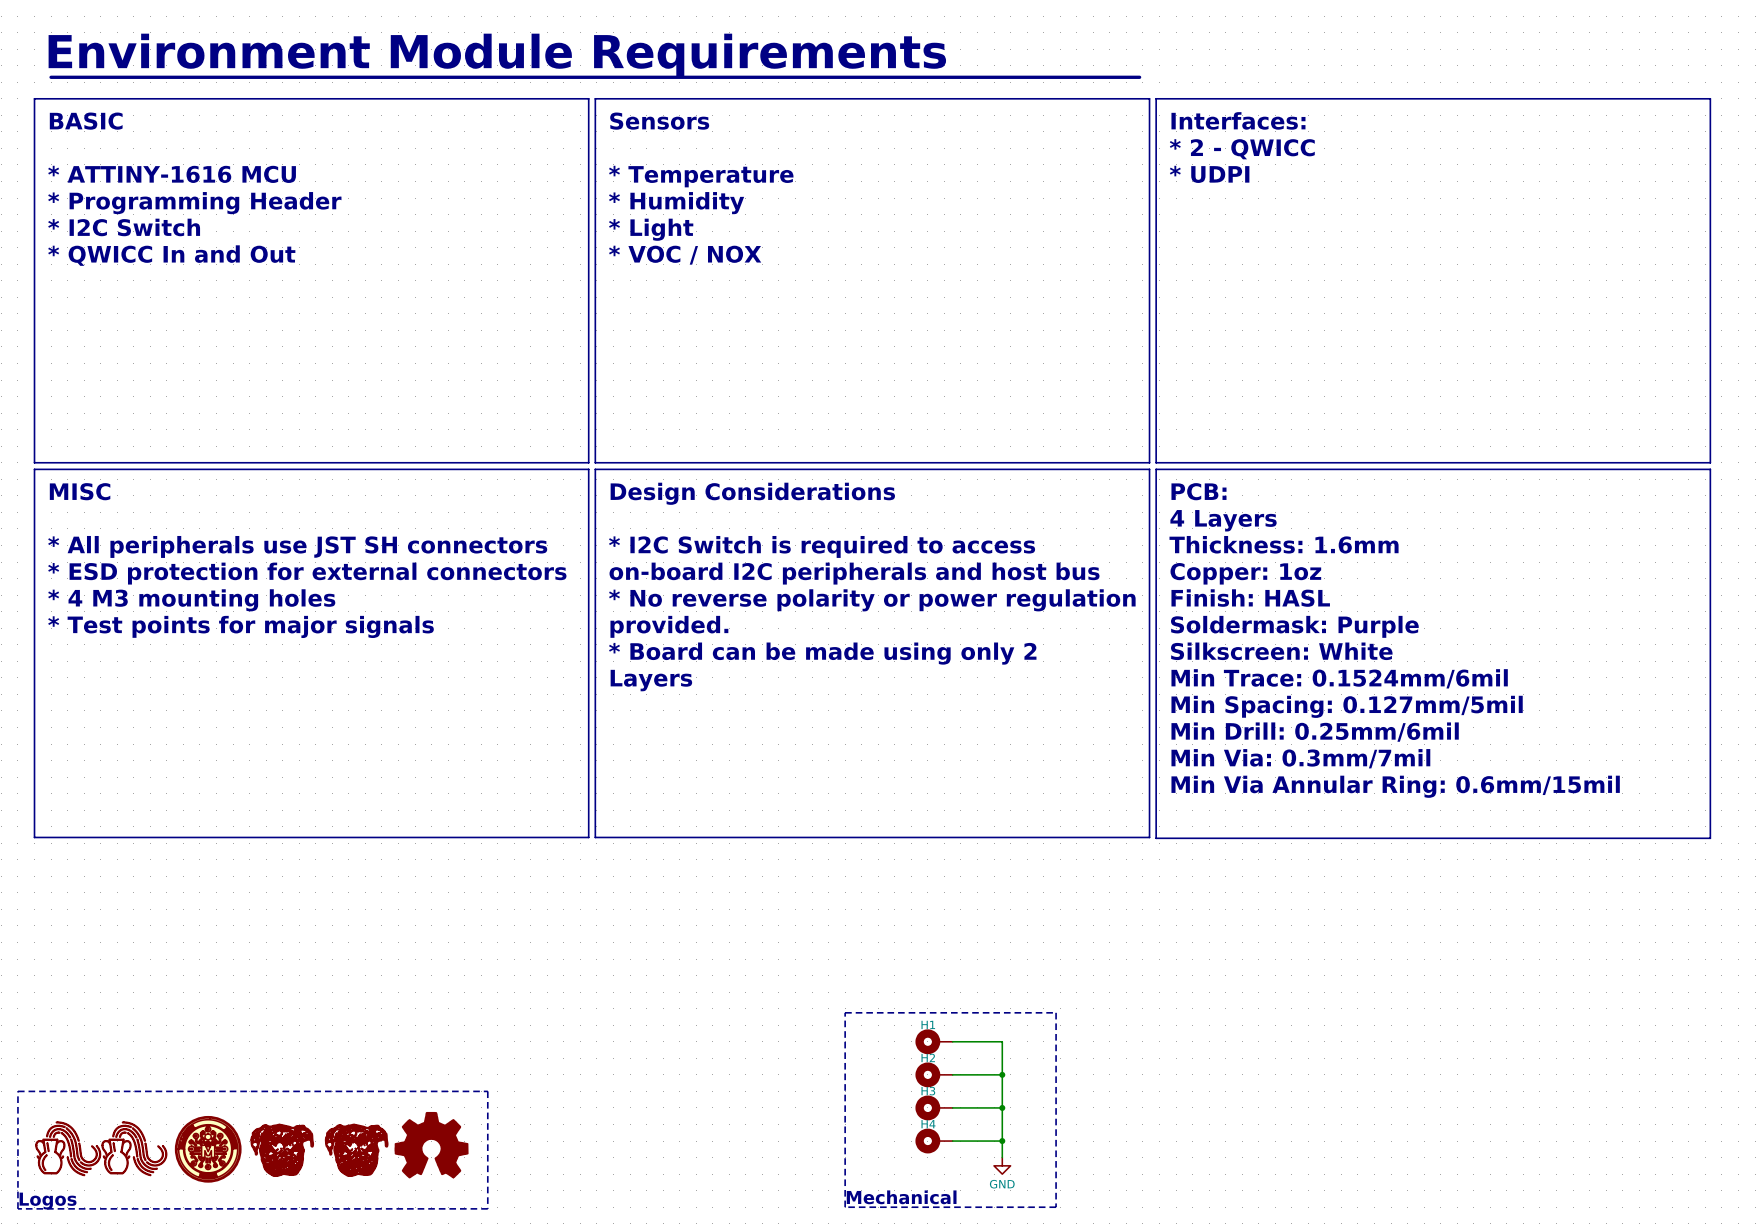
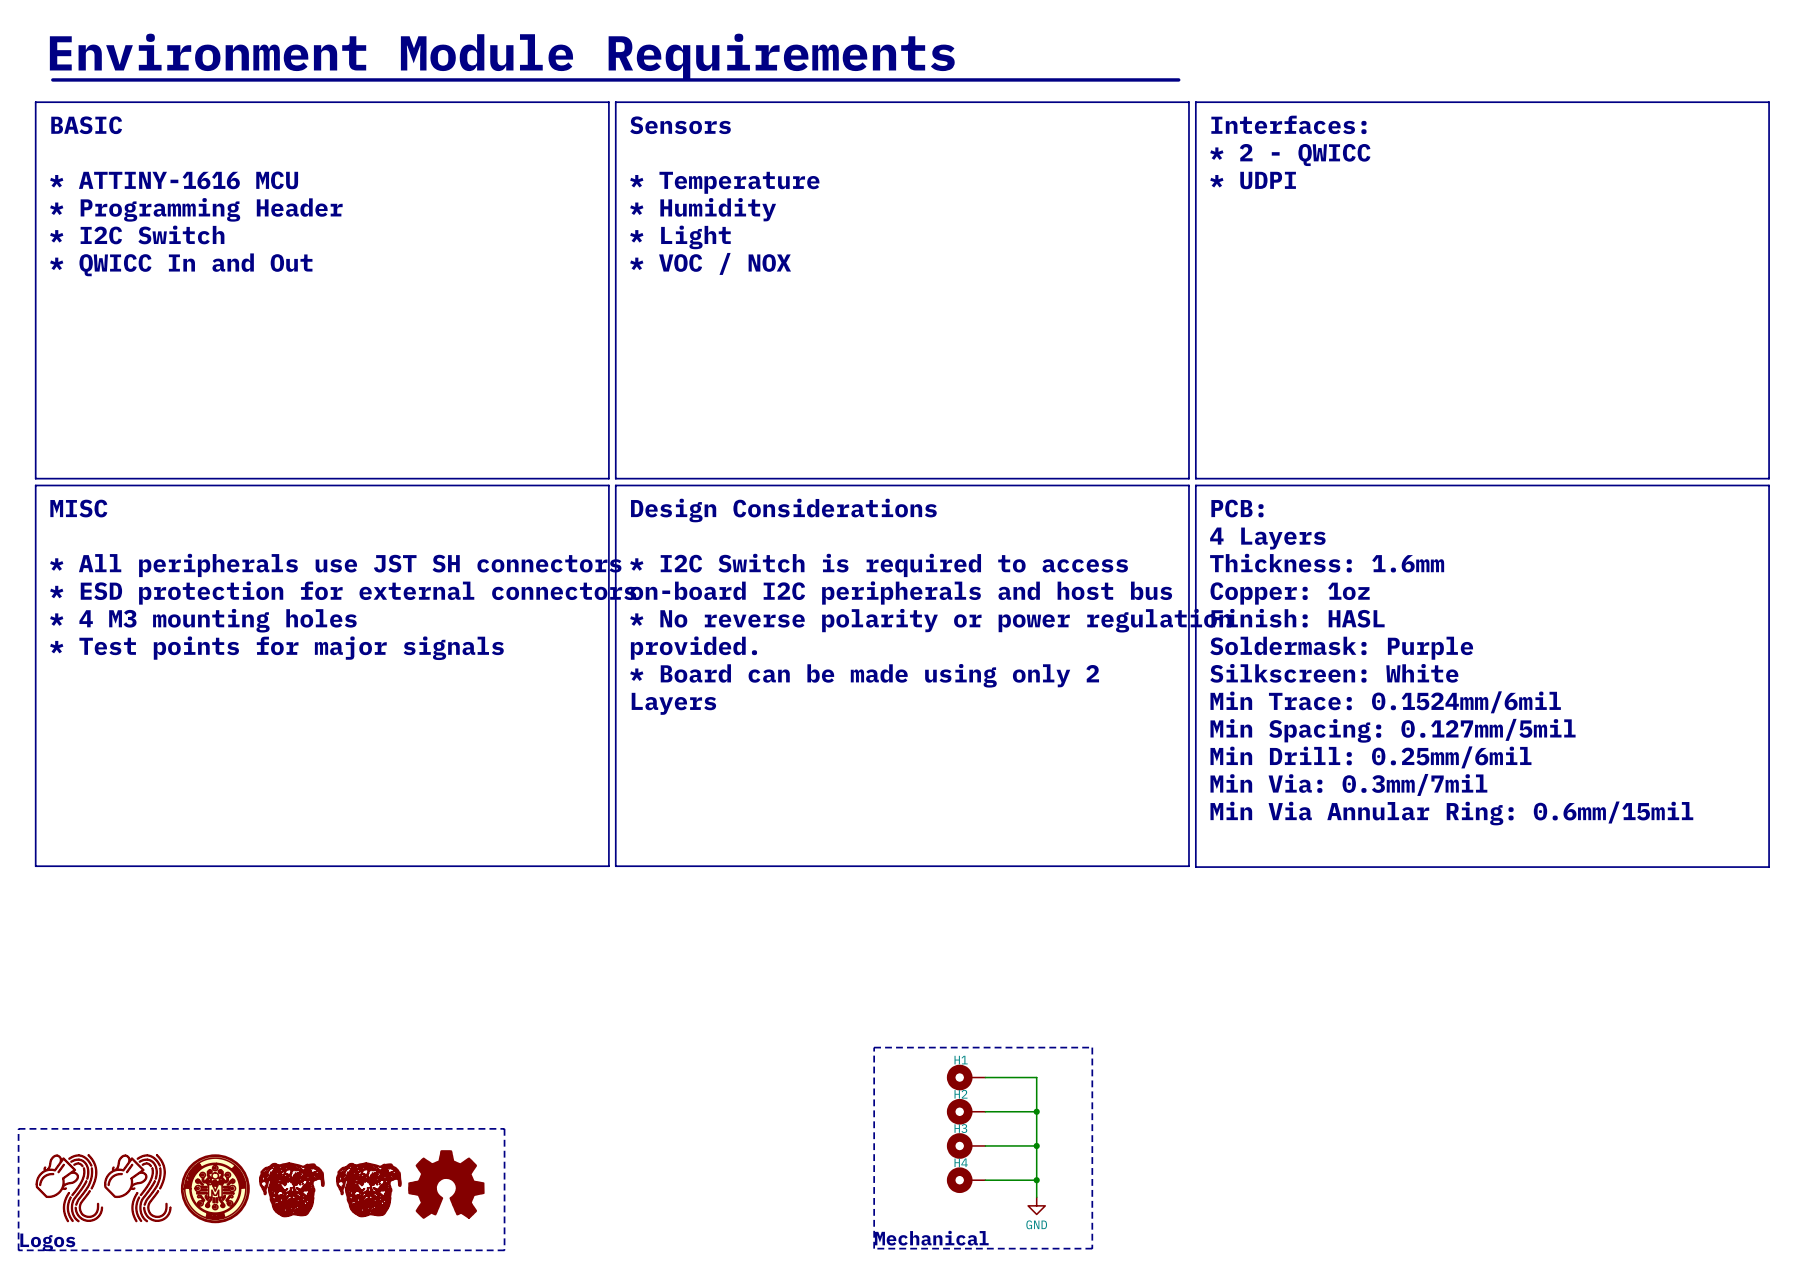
part symbol: [35, 1121, 101, 1176] -> [36, 1154, 103, 1222]
part symbol: [101, 1121, 167, 1176] -> [104, 1154, 171, 1222]

